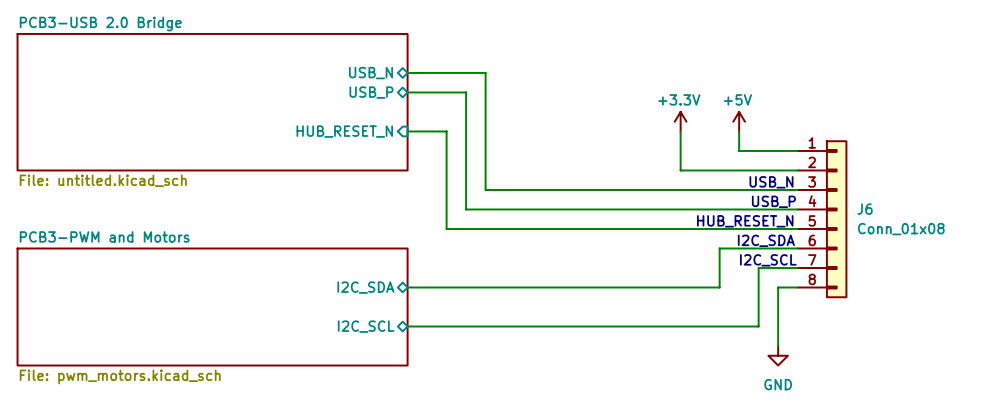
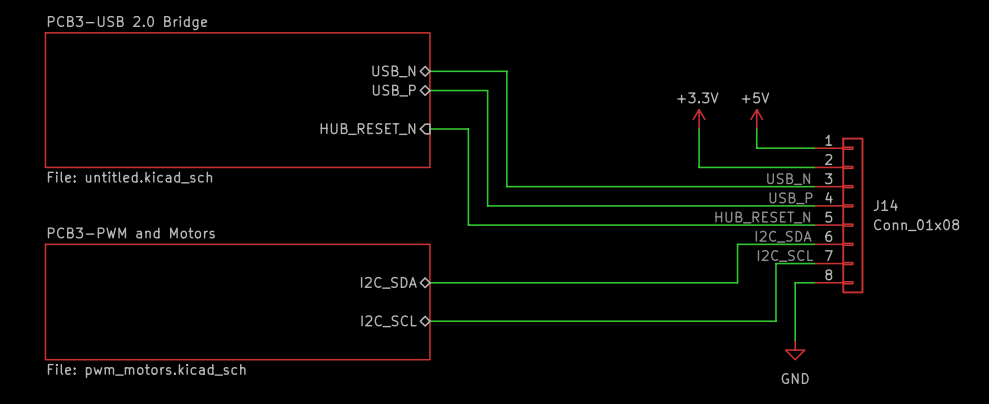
J6 name: J6 (865, 209) -> J14 (885, 205)

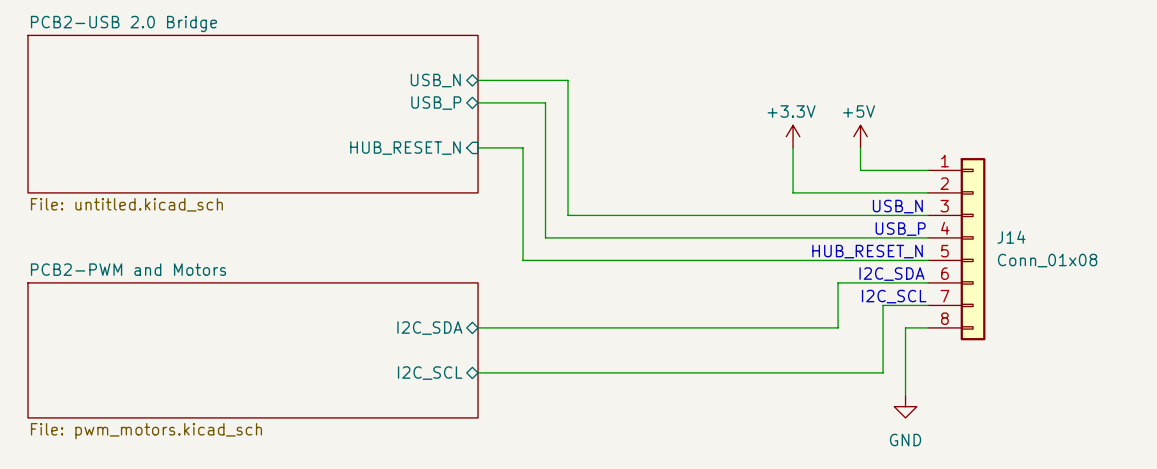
sheet PCB3-USB 2.0 Bridge name: PCB3-USB 2.0 Bridge (127, 23) -> PCB2-USB 2.0 Bridge (123, 23)
sheet PCB3-PWM and Motors name: PCB3-PWM and Motors (131, 232) -> PCB2-PWM and Motors (128, 269)

